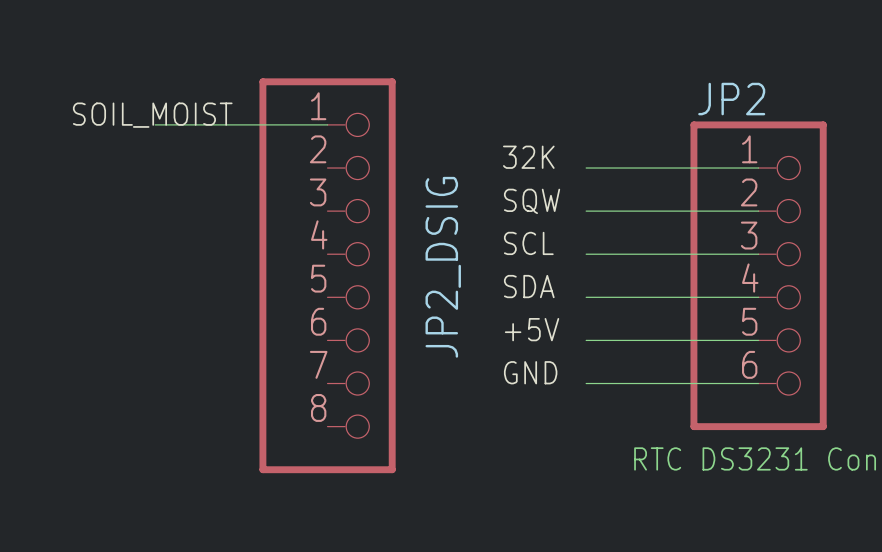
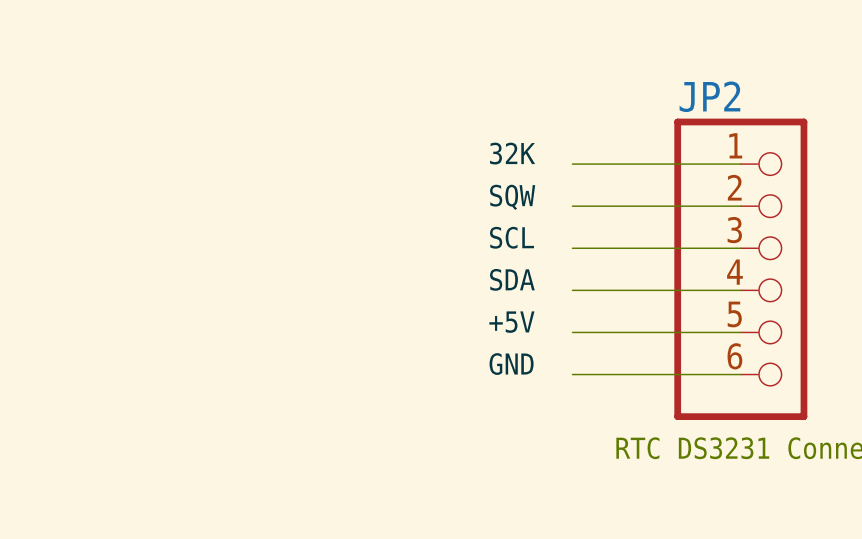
label: SOIL_MOIST (152, 115) -> none
wire: (155, 124) (327, 124) -> none
part: JP2_DSIG (327, 275) -> none

